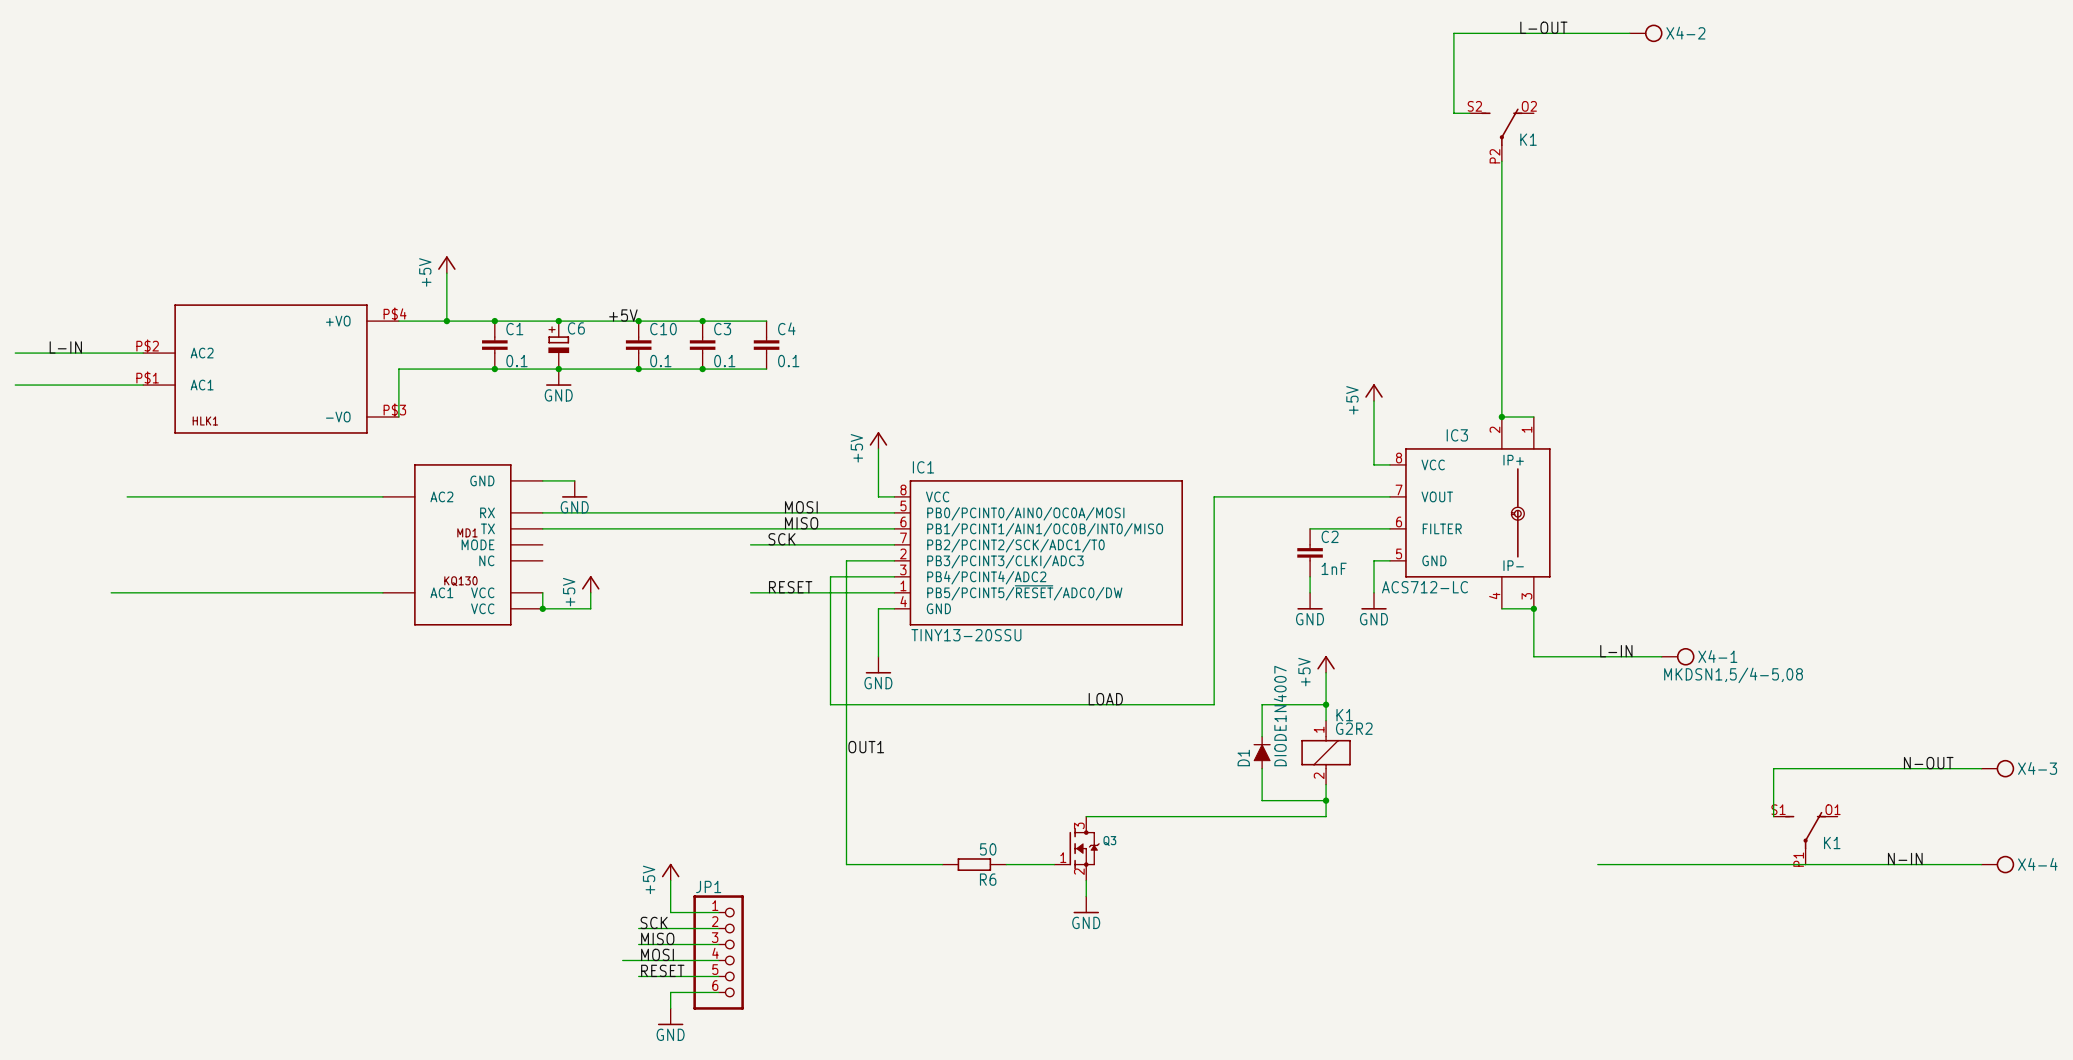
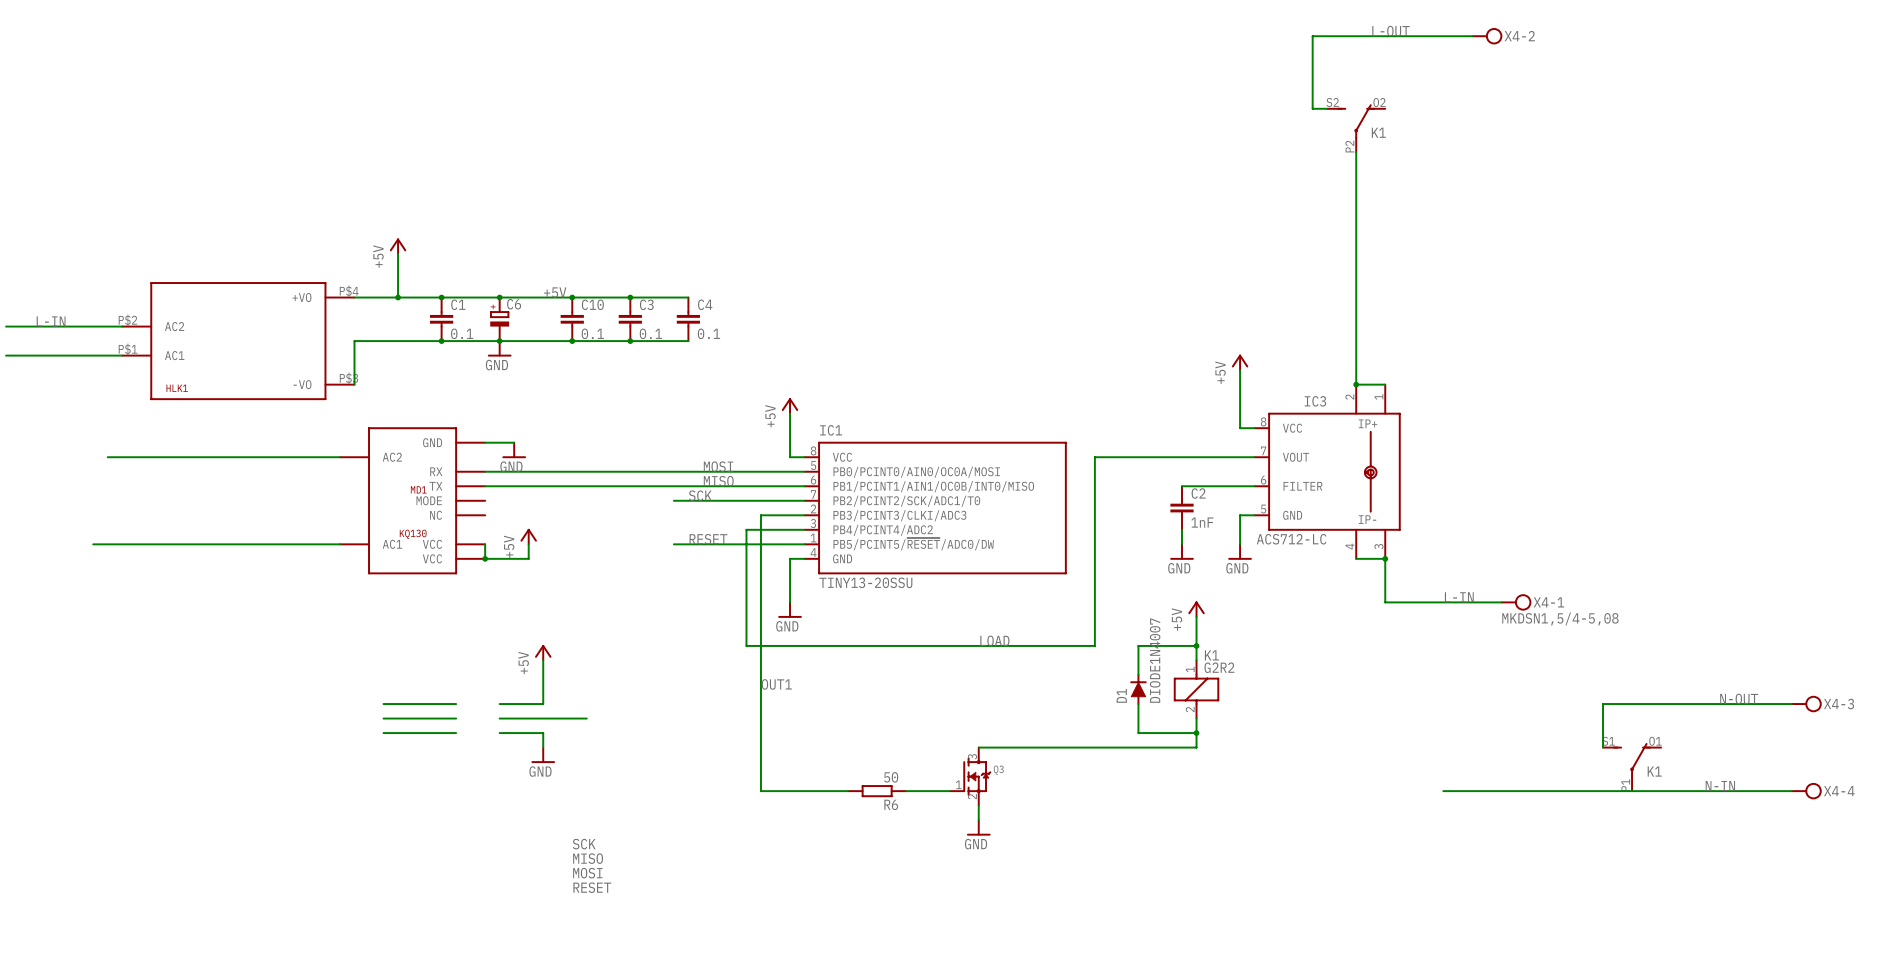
power symbol: none -> +5V (543, 652)
wire: none -> (543, 660) (543, 704) (499, 704)
wire: none -> (383, 704) (456, 704)
wire: none -> (383, 718) (456, 718)
wire: none -> (499, 718) (586, 718)
wire: none -> (383, 733) (456, 733)
wire: none -> (499, 733) (543, 733) (543, 747)
power symbol: none -> GND (543, 755)
power symbol: +5V (670, 872) -> none
wire: (670, 880) (670, 912) (718, 912) -> none
wire: (638, 928) (718, 928) -> none
wire: (638, 944) (718, 944) -> none
JP1: (718, 952) -> none
wire: (622, 960) (718, 960) -> none
wire: (638, 976) (718, 976) -> none
wire: (718, 992) (670, 992) (670, 1008) -> none
power symbol: GND (670, 1016) -> none

